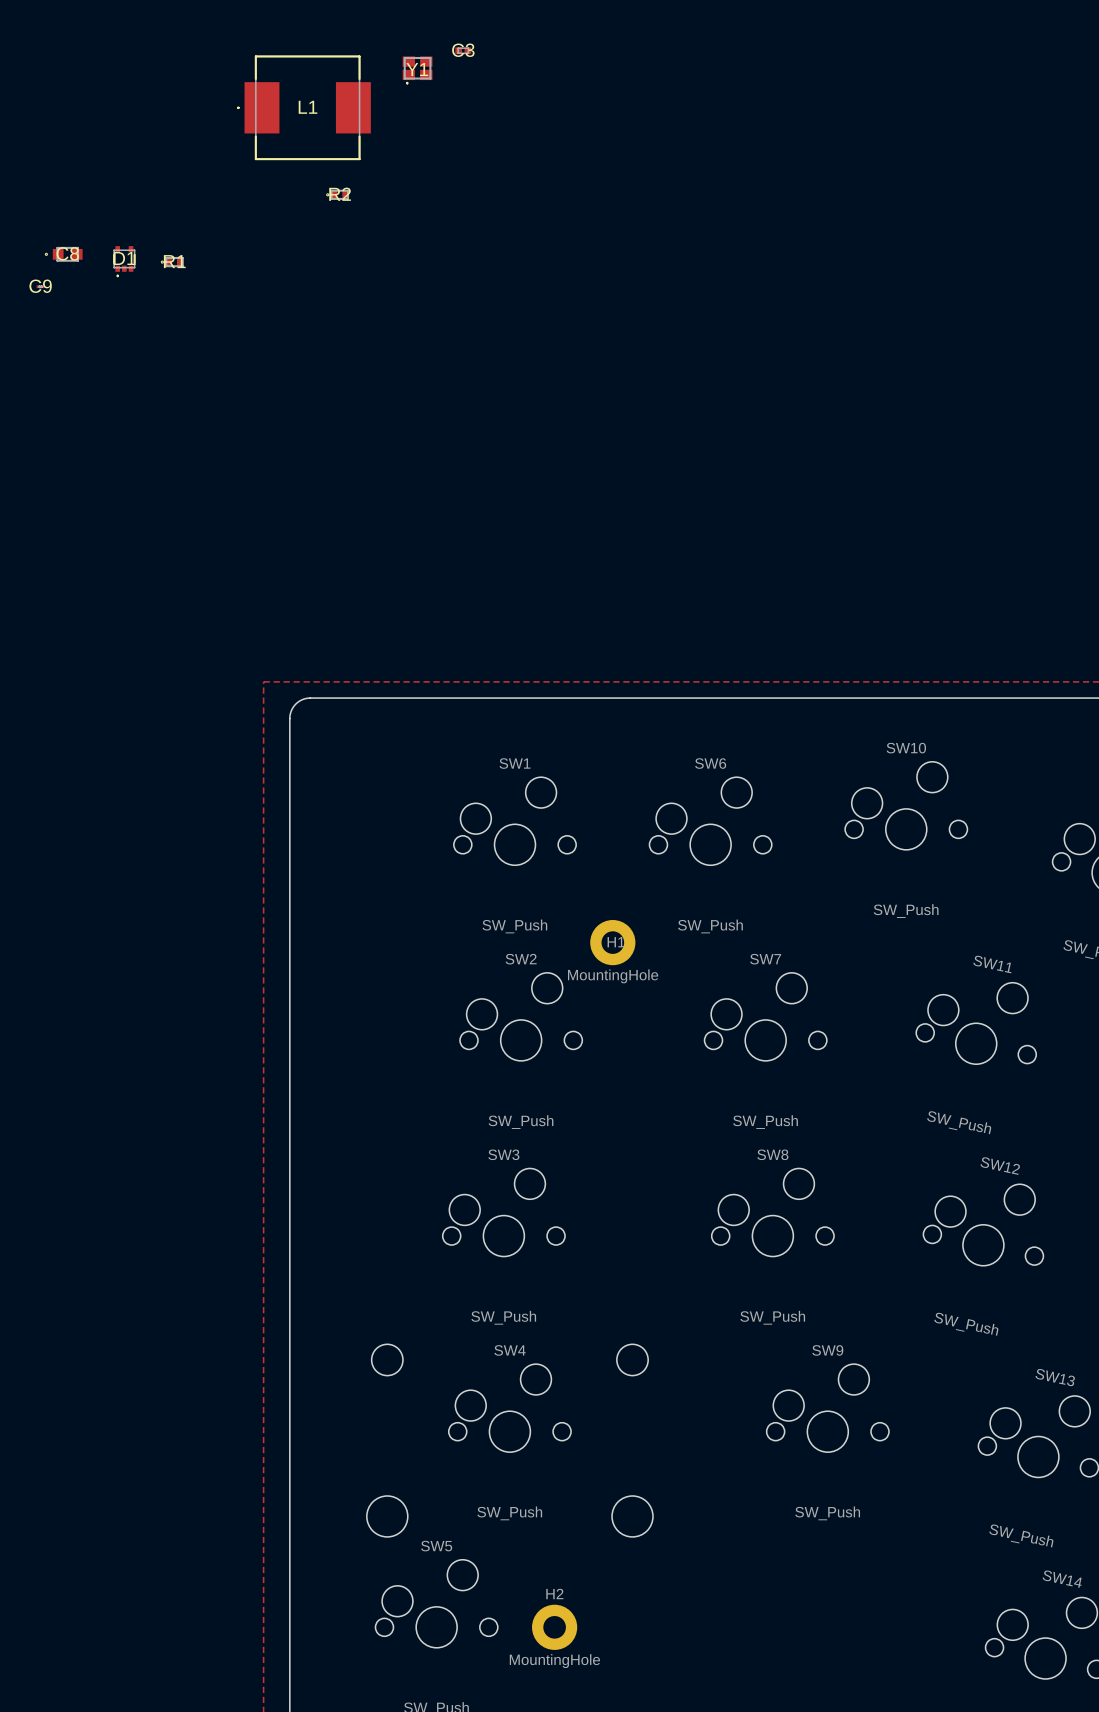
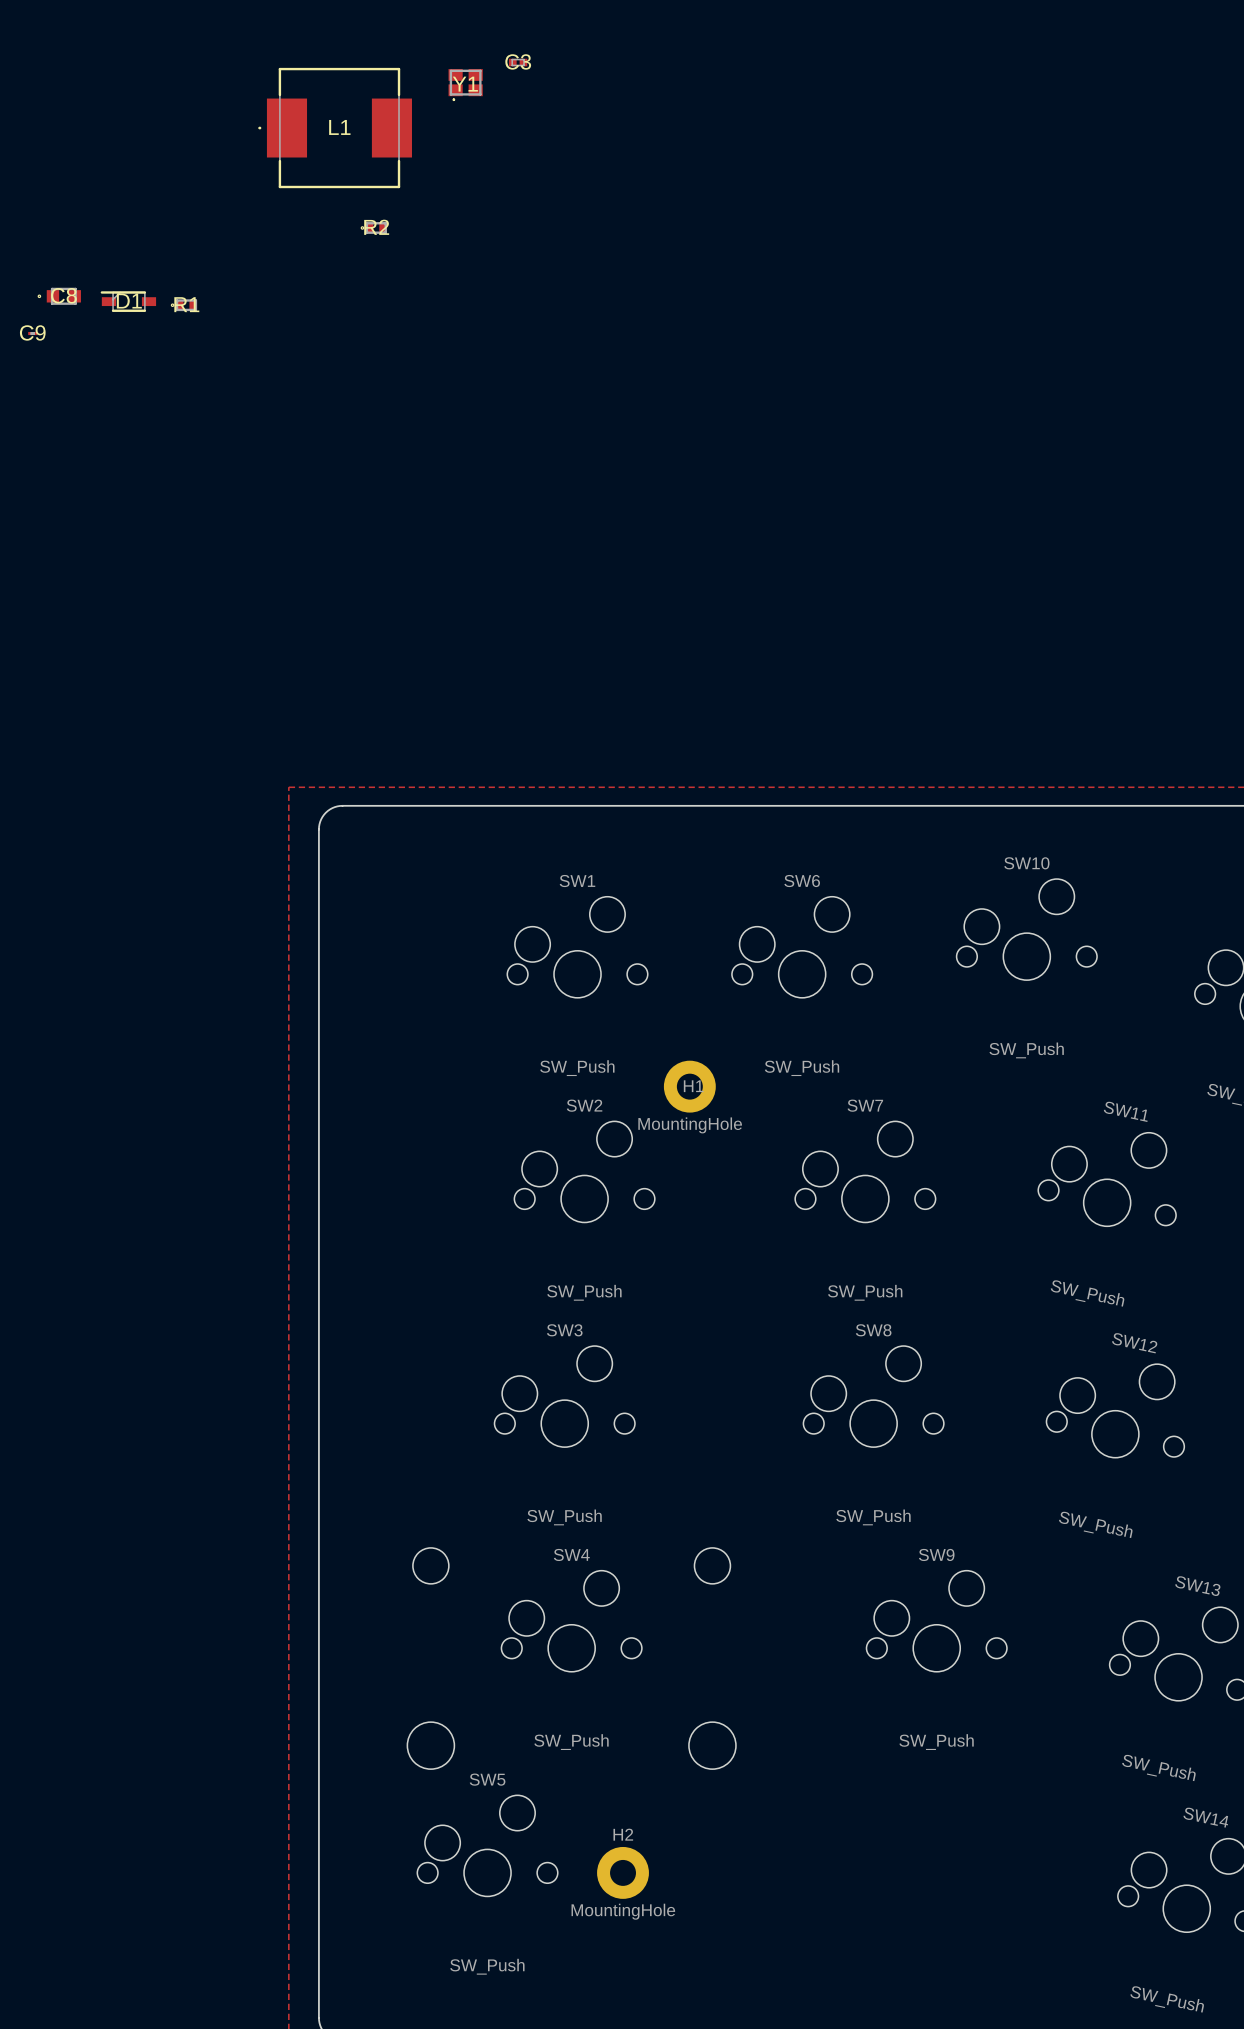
D1 footprint: [113, 246, 136, 277] -> [100, 291, 157, 312]

